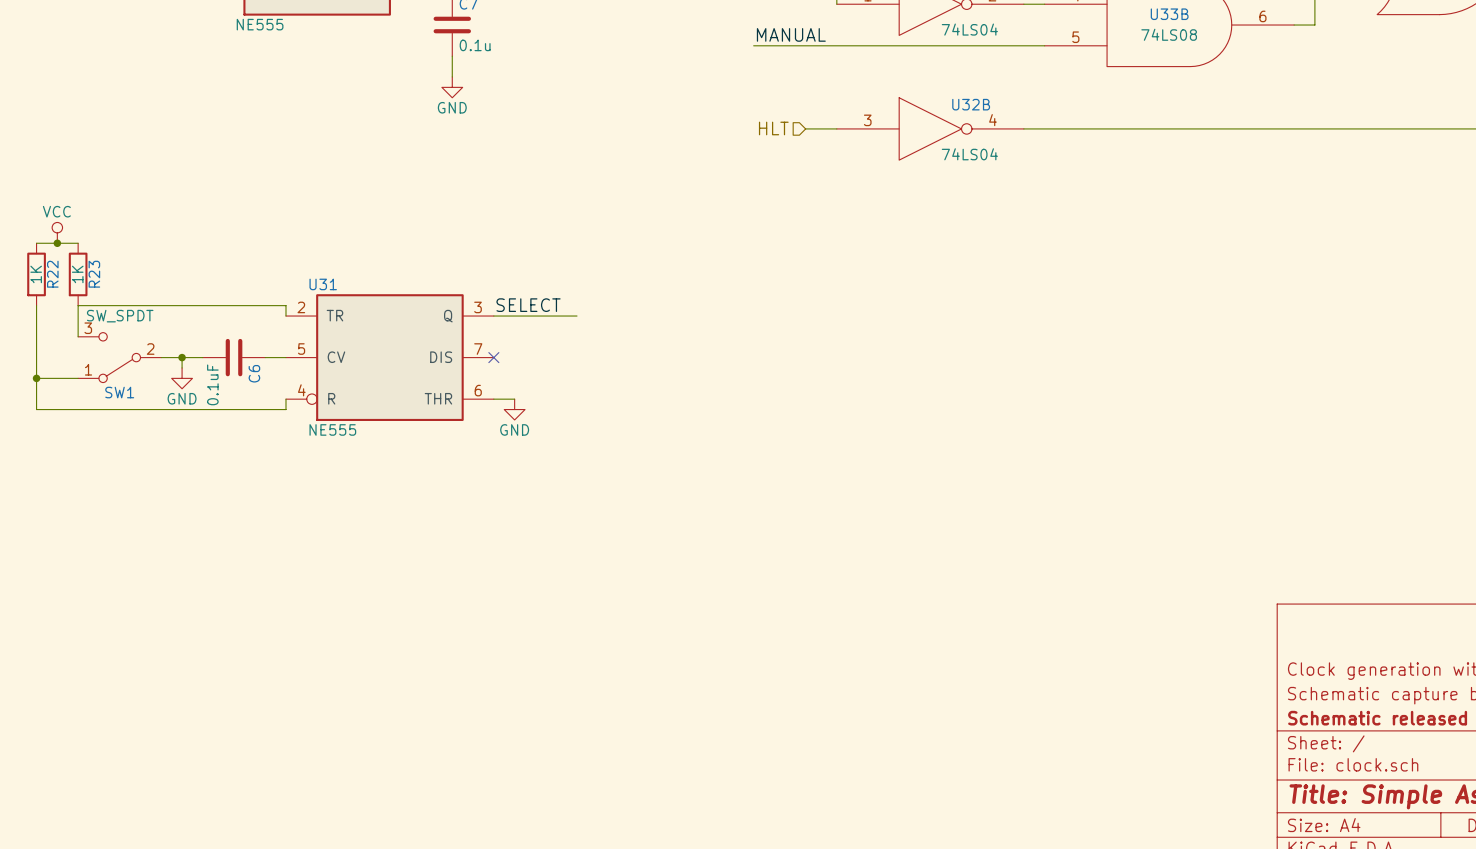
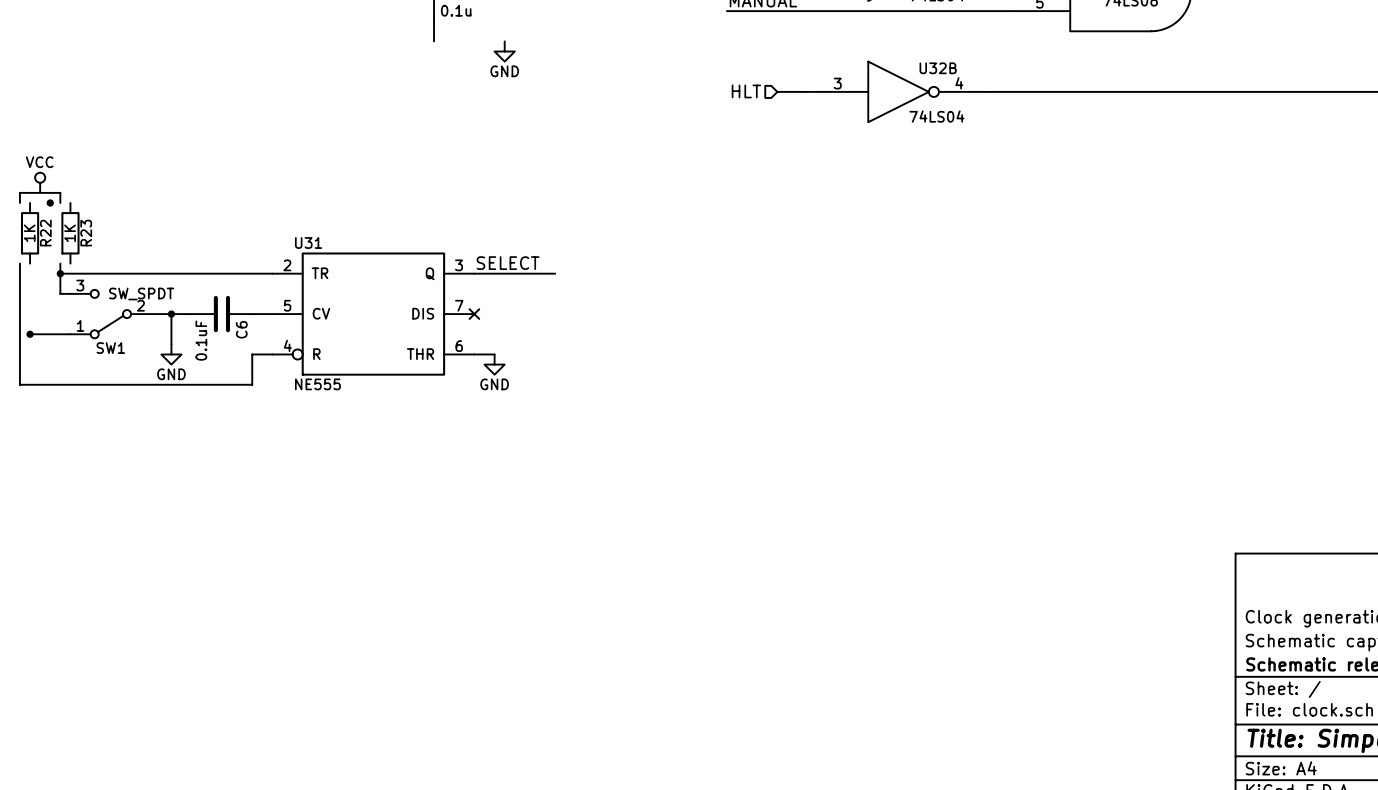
power symbol position: GND (452, 87) -> GND (504, 51)
power symbol position: VCC (57, 232) -> VCC (40, 182)
wire: none -> (19, 202) (19, 192) (60, 192) (60, 202)
wire: (36, 243) (78, 243) -> none
wire: (36, 305) (36, 409) (285, 409) (285, 399) -> (19, 263) (19, 384) (252, 384) (252, 354) (272, 354)
wire: none -> (60, 263) (60, 293) (70, 293)
junction: none -> (60, 273)
SW1 value position: SW_SPDT (120, 316) -> SW_SPDT (141, 293)
wire: (285, 316) (285, 305) (78, 305) (78, 336) -> (272, 273) (60, 273)
power symbol position: GND (182, 378) -> GND (171, 354)

